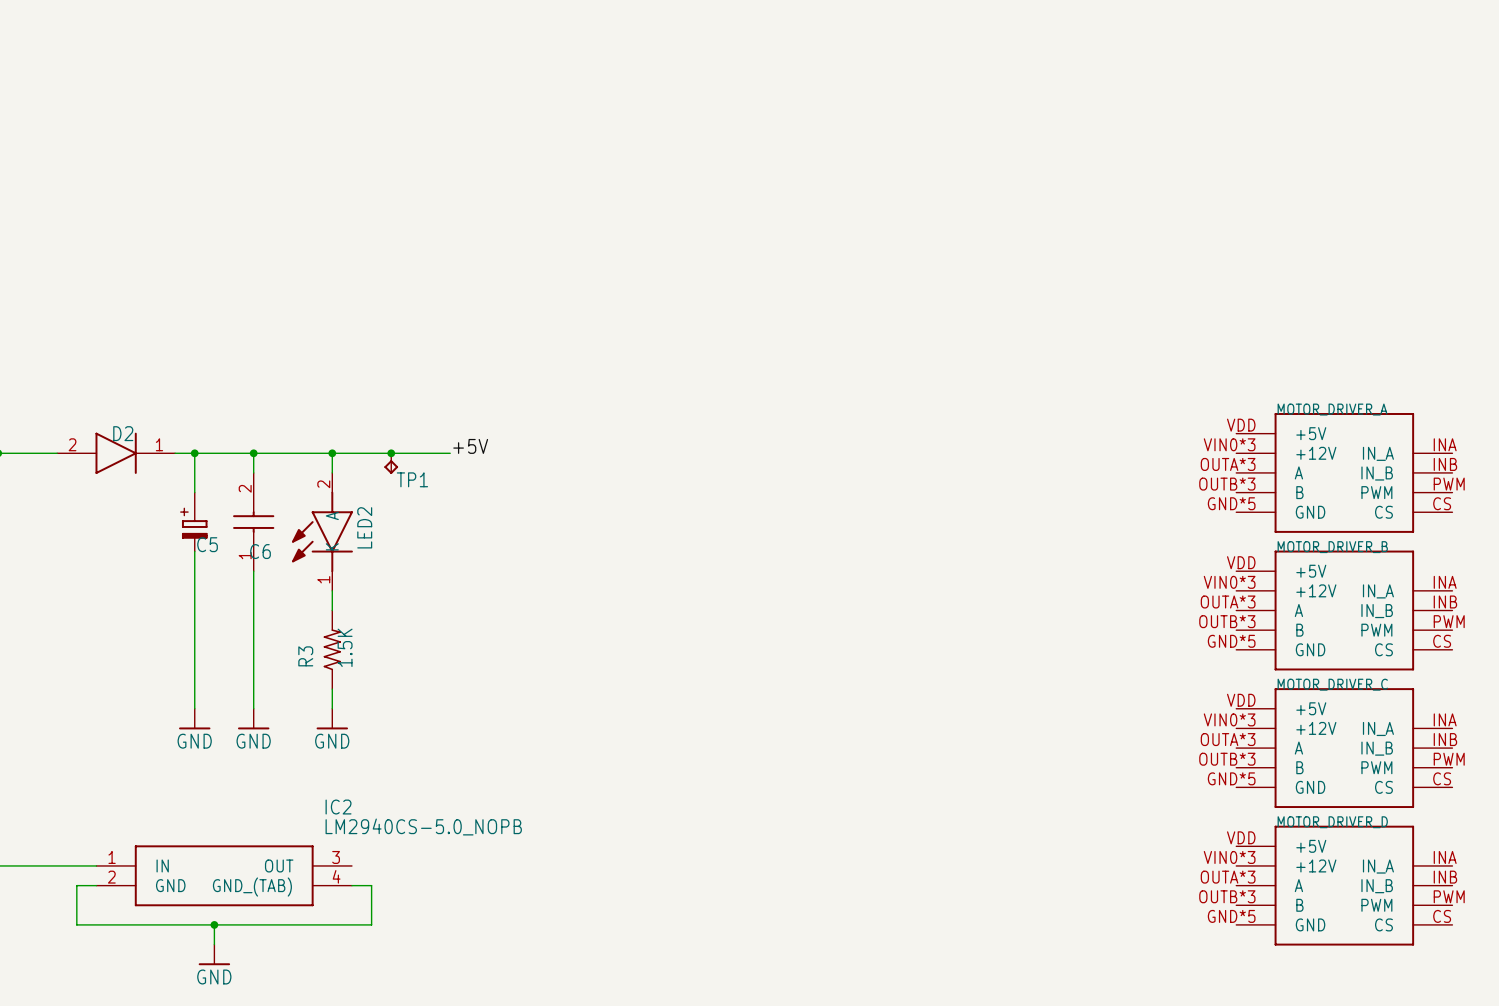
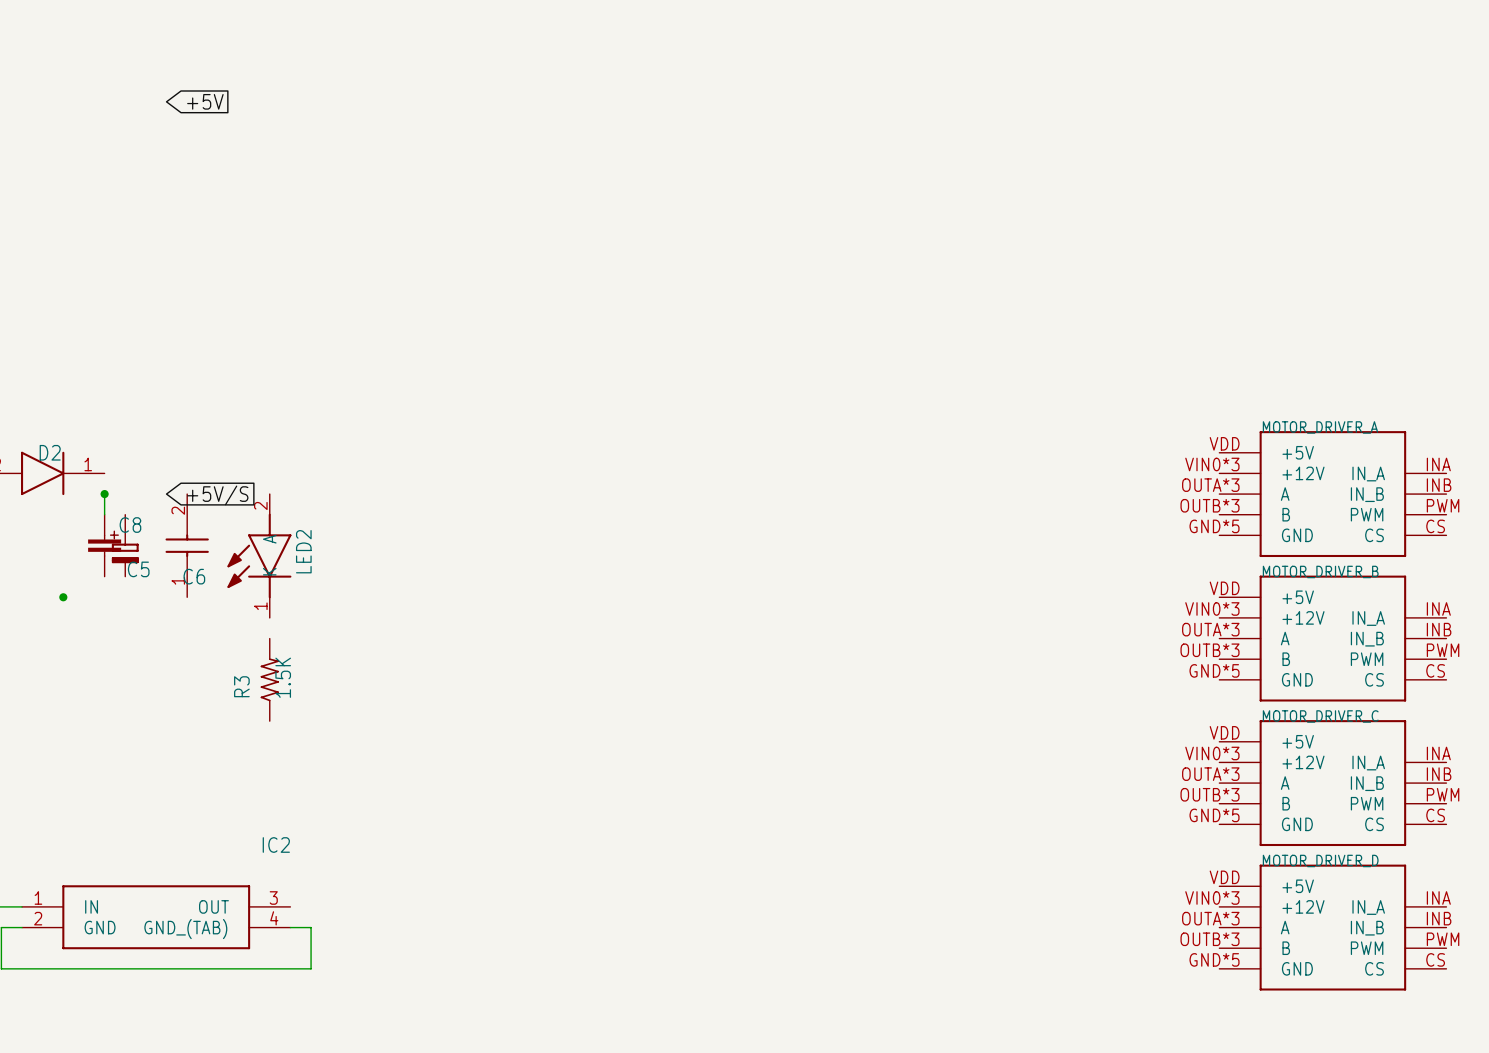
global label: none -> +5V (205, 101)
label: +5V (470, 446) -> none
wire: (175, 453) (450, 453) -> none
wire: (194, 453) (194, 492) -> none
junction position: (194, 453) -> (104, 494)
wire: (253, 453) (253, 472) -> (104, 494) (104, 514)
junction: (253, 453) -> none
wire: (332, 453) (332, 472) -> none
junction: (332, 453) -> none
junction: (391, 453) -> none
TP1: (391, 463) -> none
global label: none -> +5V/S (217, 495)
C8: none -> (104, 545)
wire: (194, 551) (194, 708) -> none
junction: none -> (63, 597)
wire: (253, 571) (253, 708) -> none
wire: (332, 590) (332, 610) -> none
wire: (332, 689) (332, 708) -> none
power symbol: GND (194, 719) -> none
power symbol: GND (253, 719) -> none
power symbol: GND (332, 719) -> none
IC2 value: LM2940CS-5.0_NOPB (423, 827) -> none
wire: (214, 924) (214, 944) -> none
junction: (214, 924) -> none
power symbol: GND (214, 954) -> none

